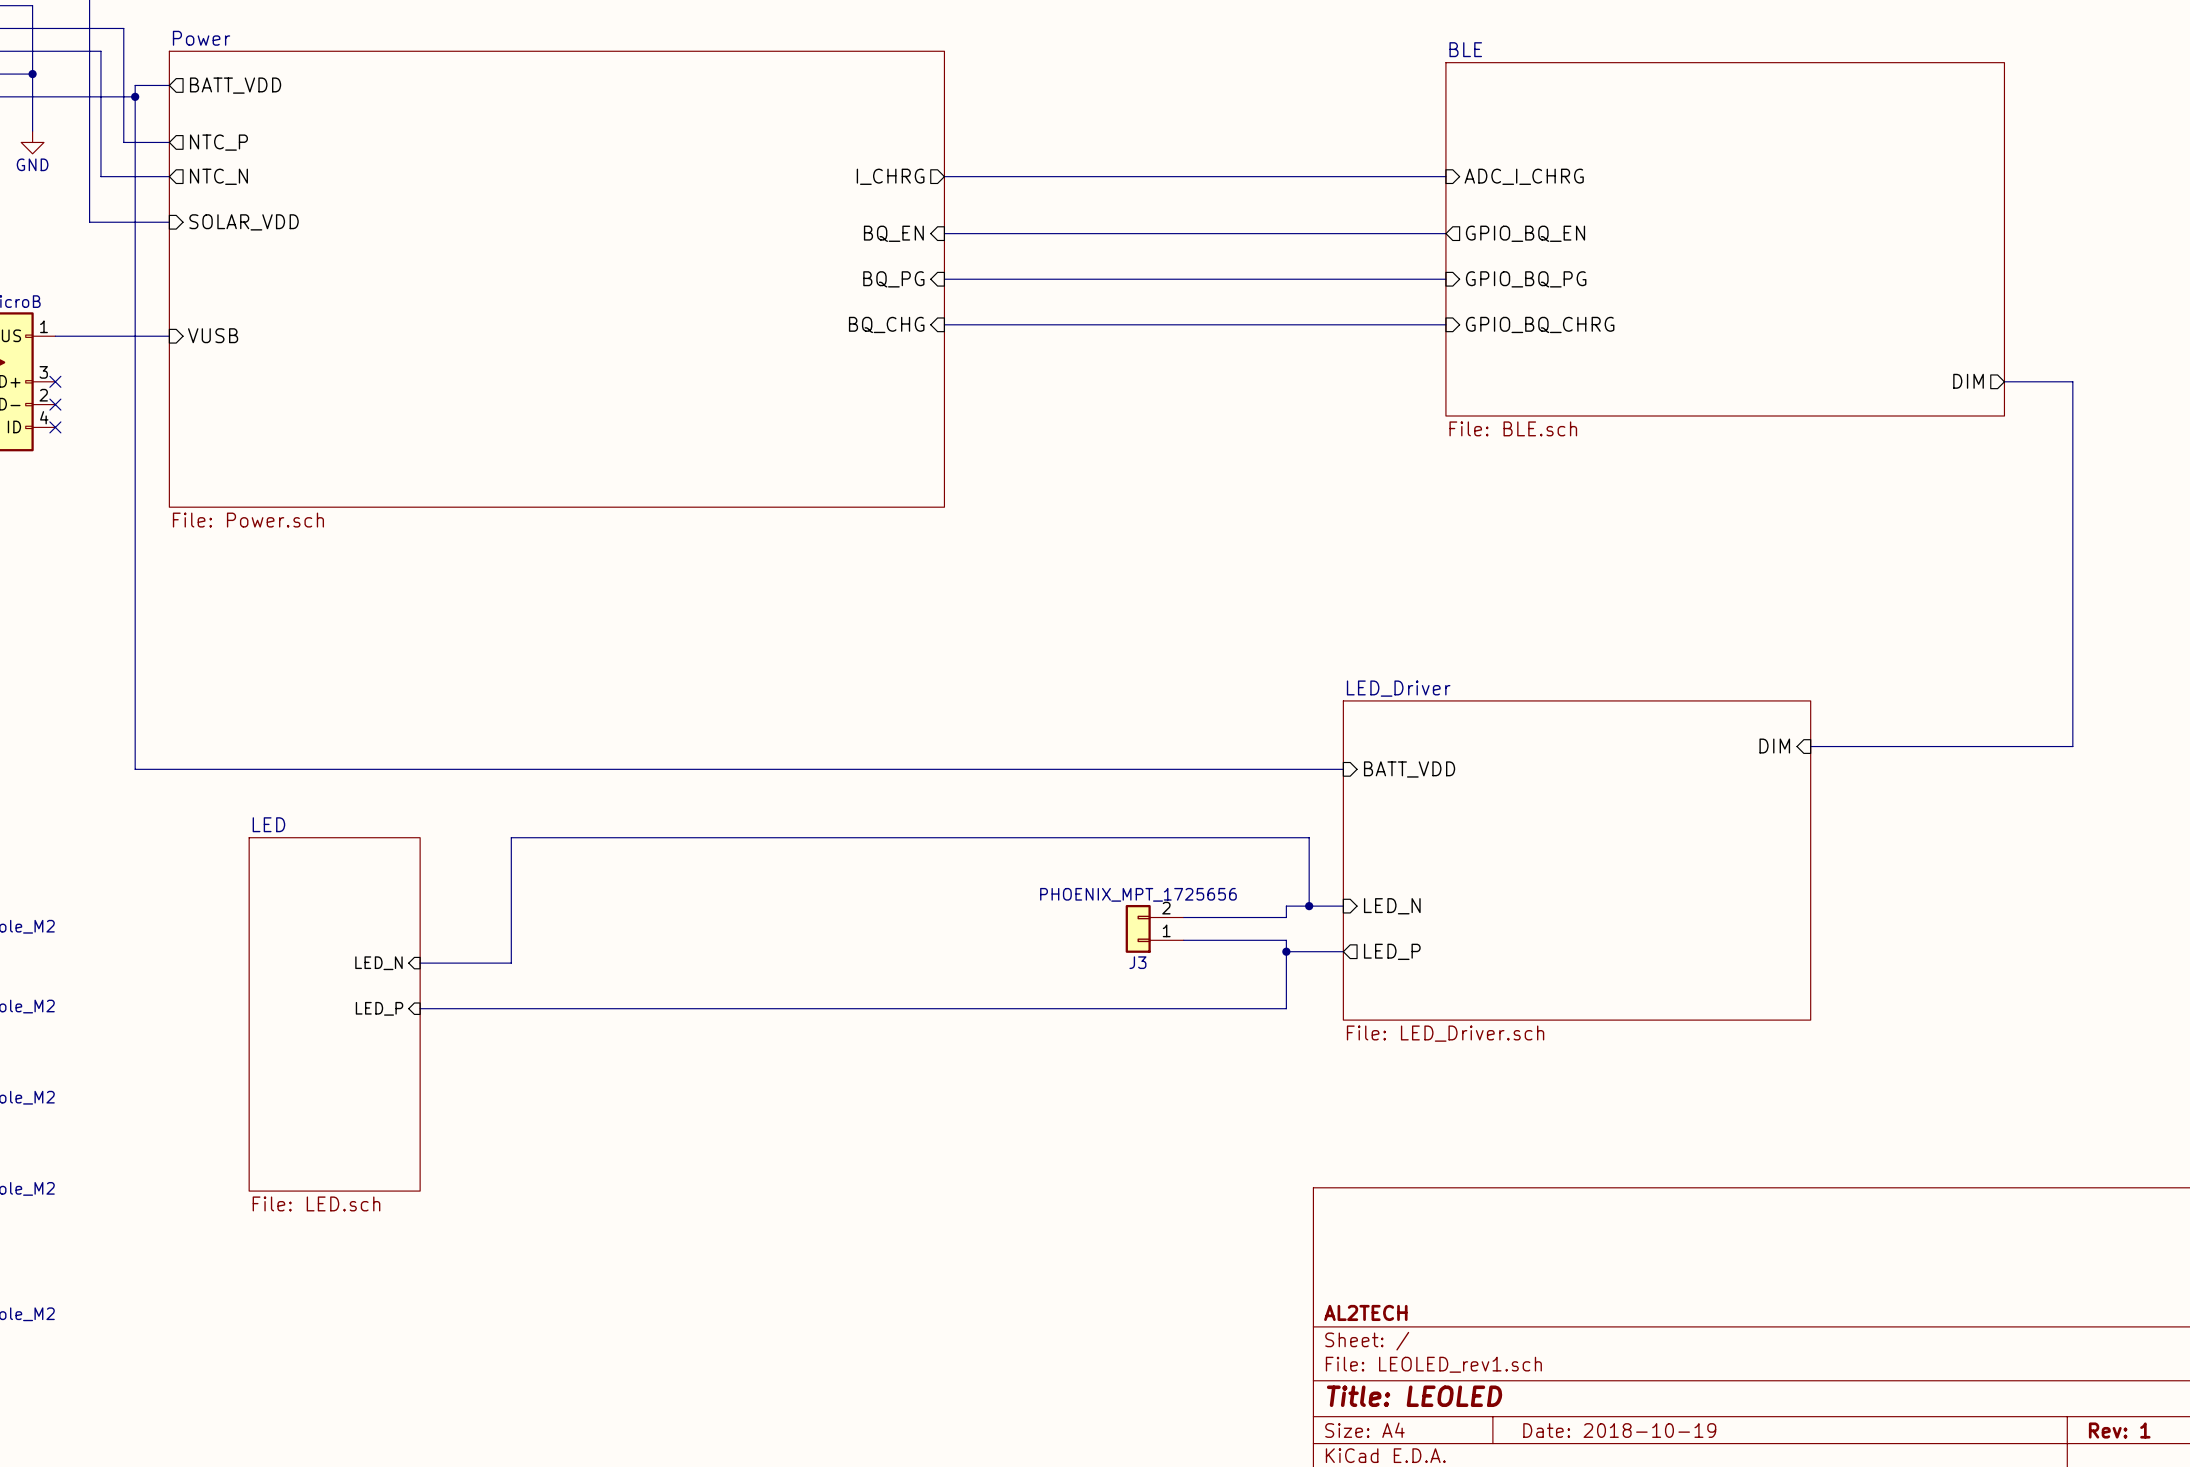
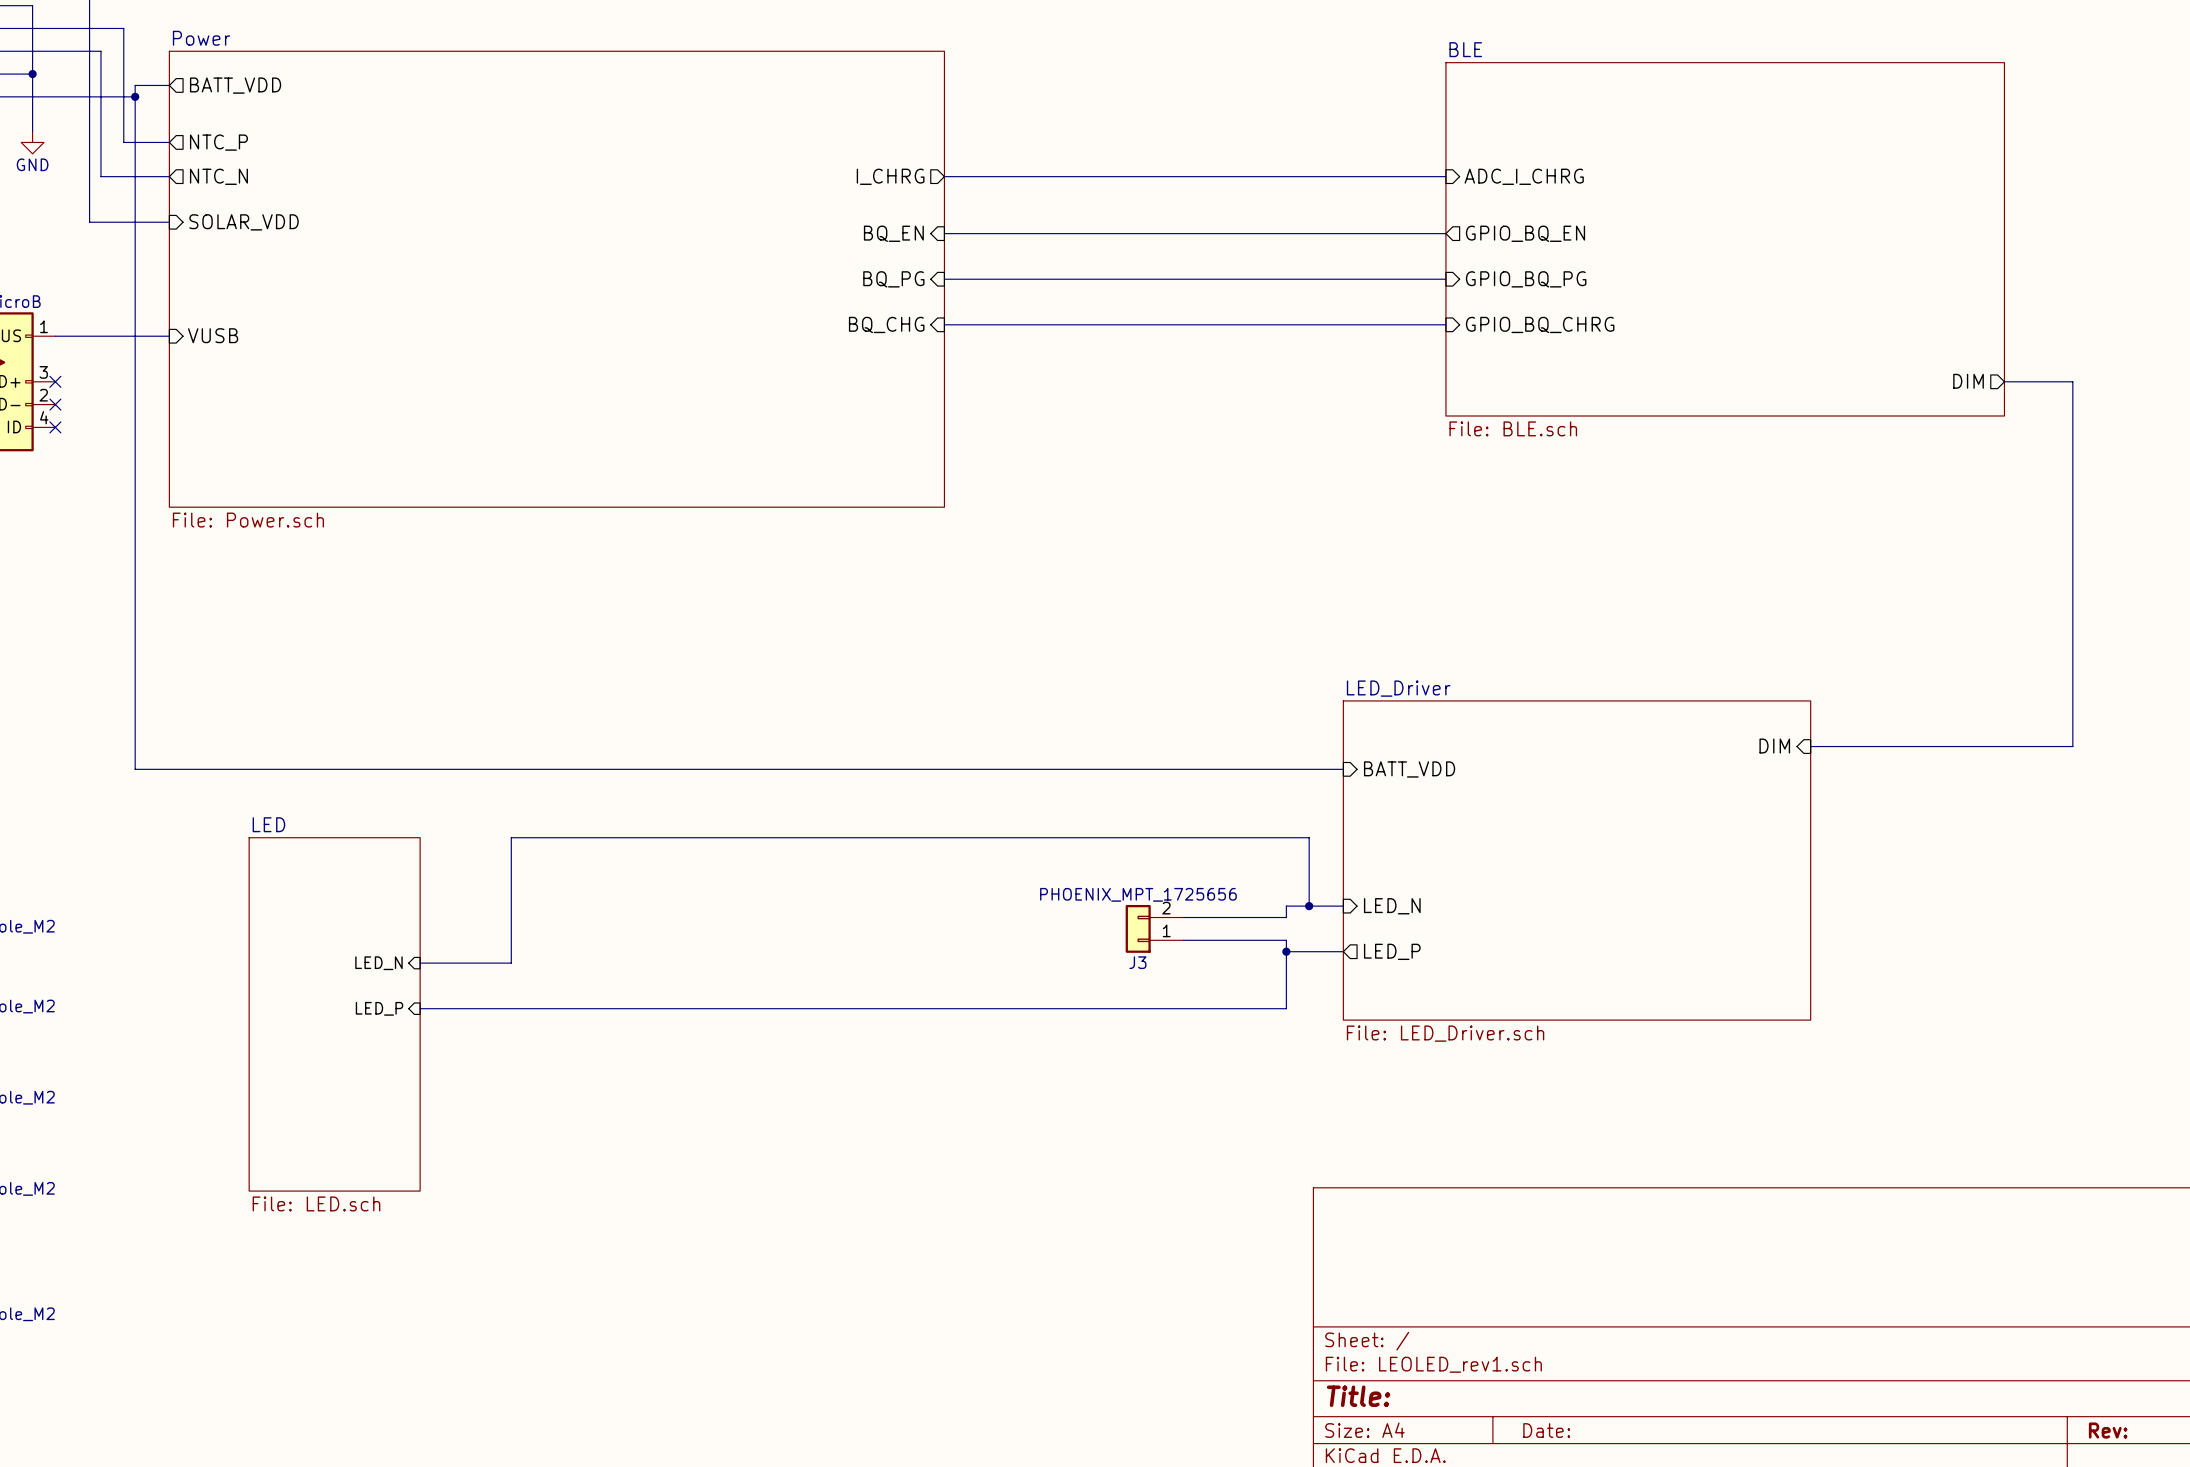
title block: AL2TECH (1365, 1312) -> none
title block: Title: LEOLED (1414, 1396) -> Title: (1358, 1396)
title block: Date: 2018-10-19 (1619, 1430) -> Date: (1546, 1430)
title block: Rev: 1 (2119, 1430) -> Rev: (2108, 1430)

